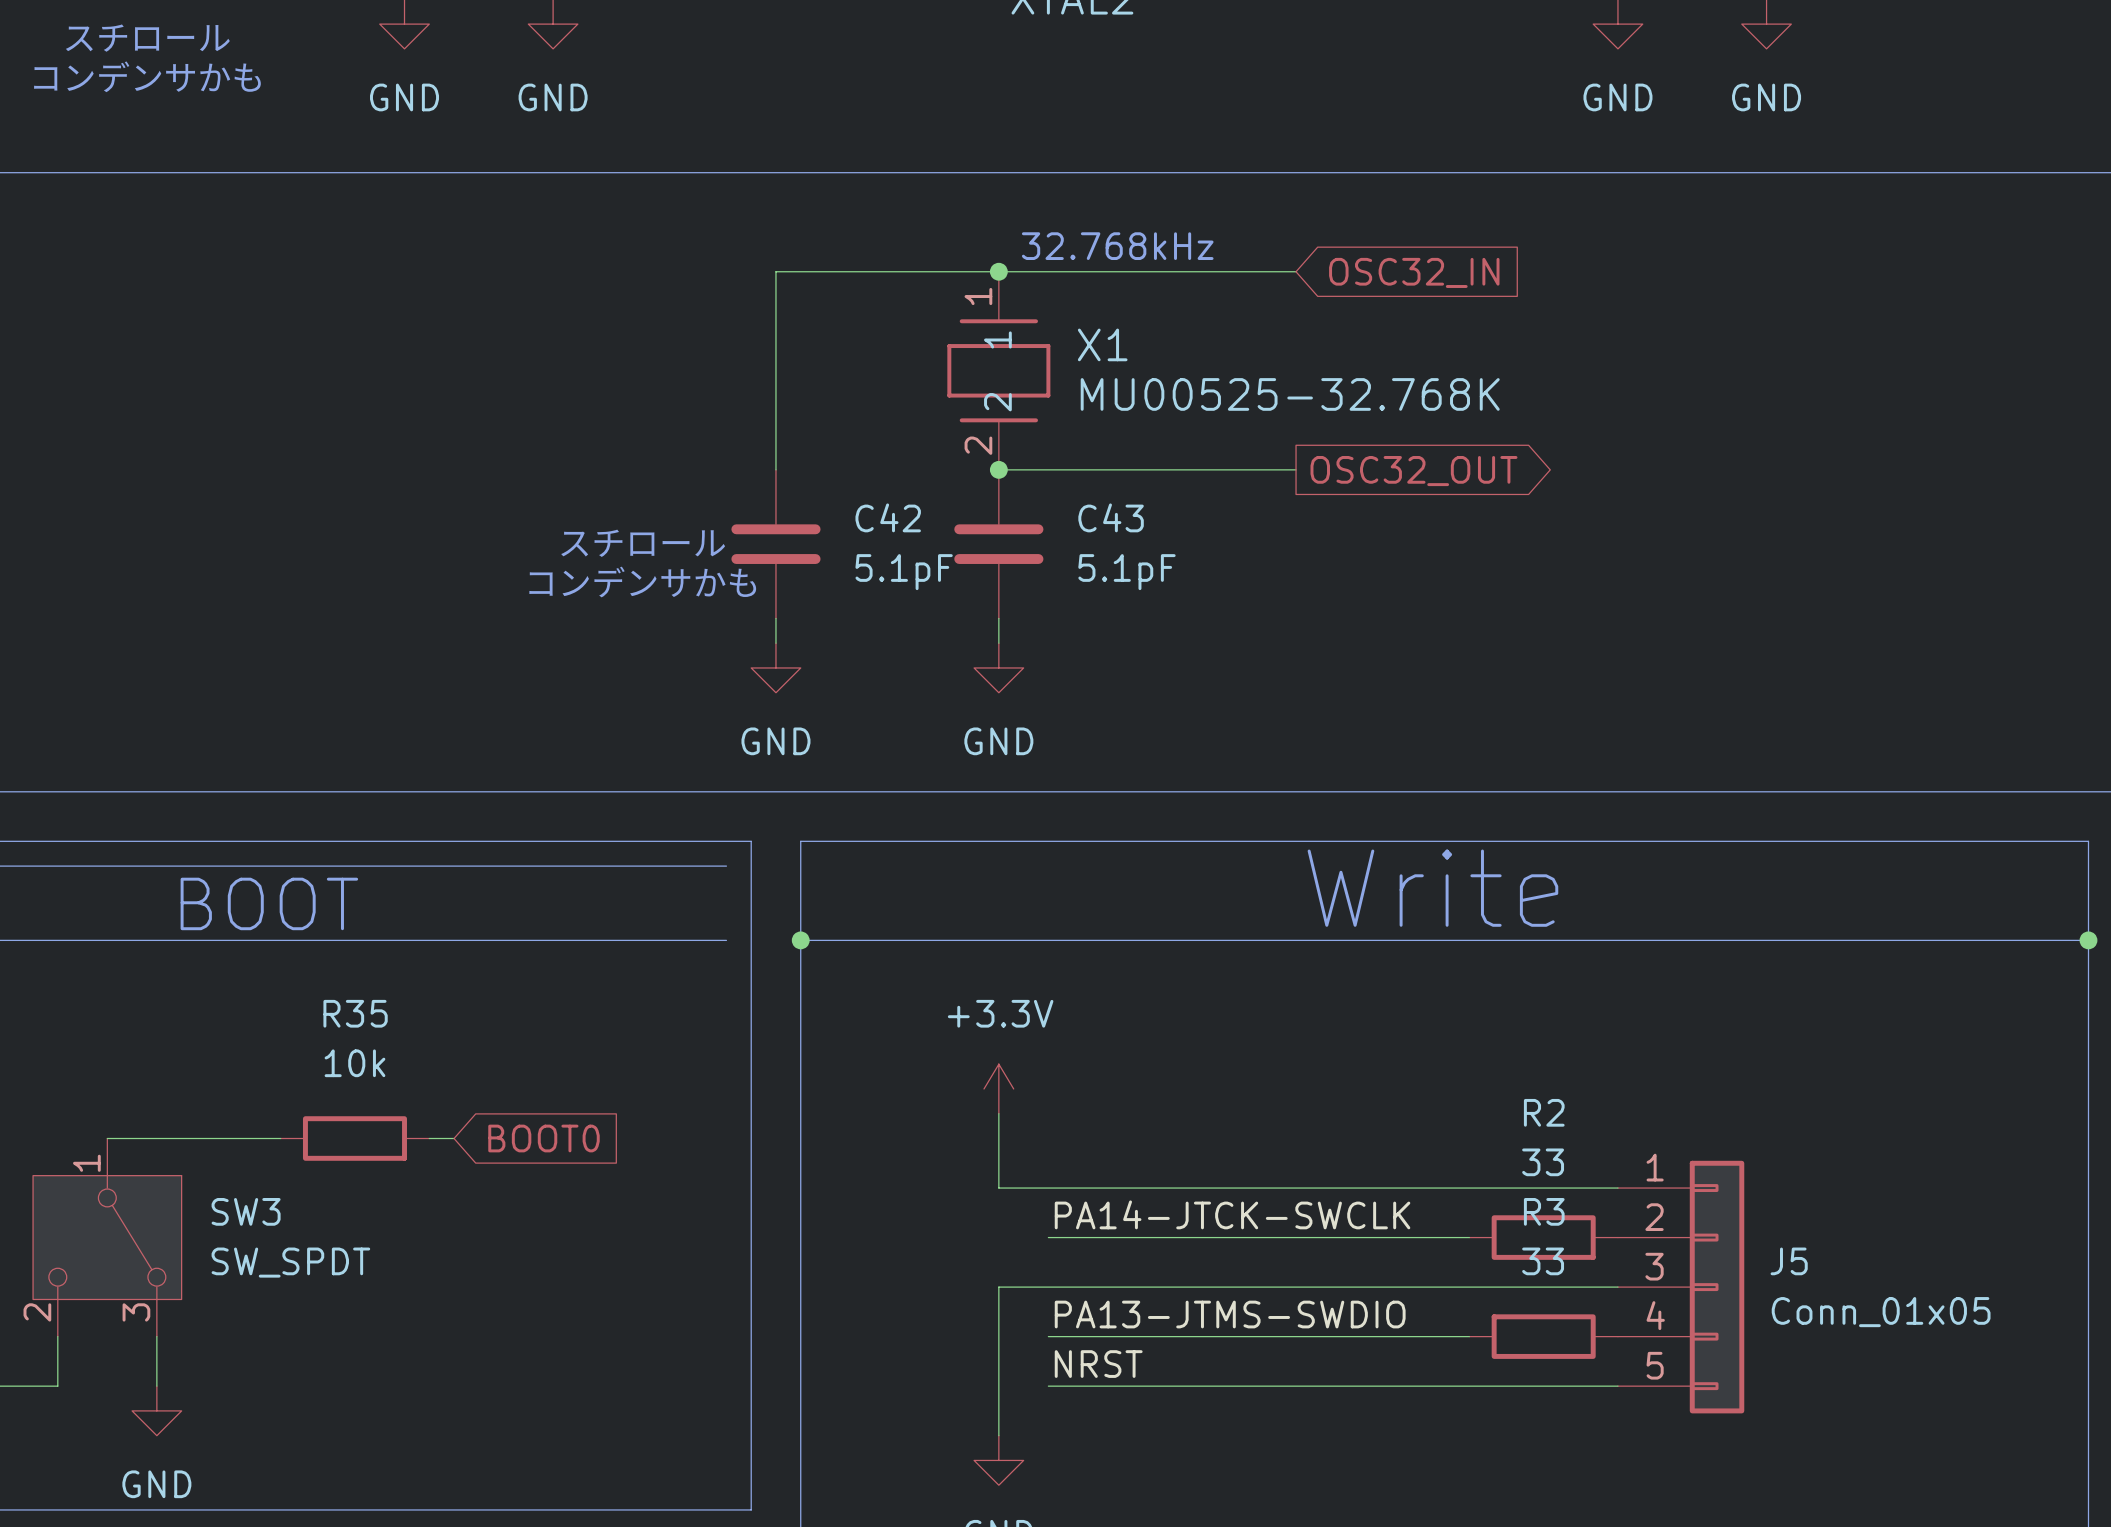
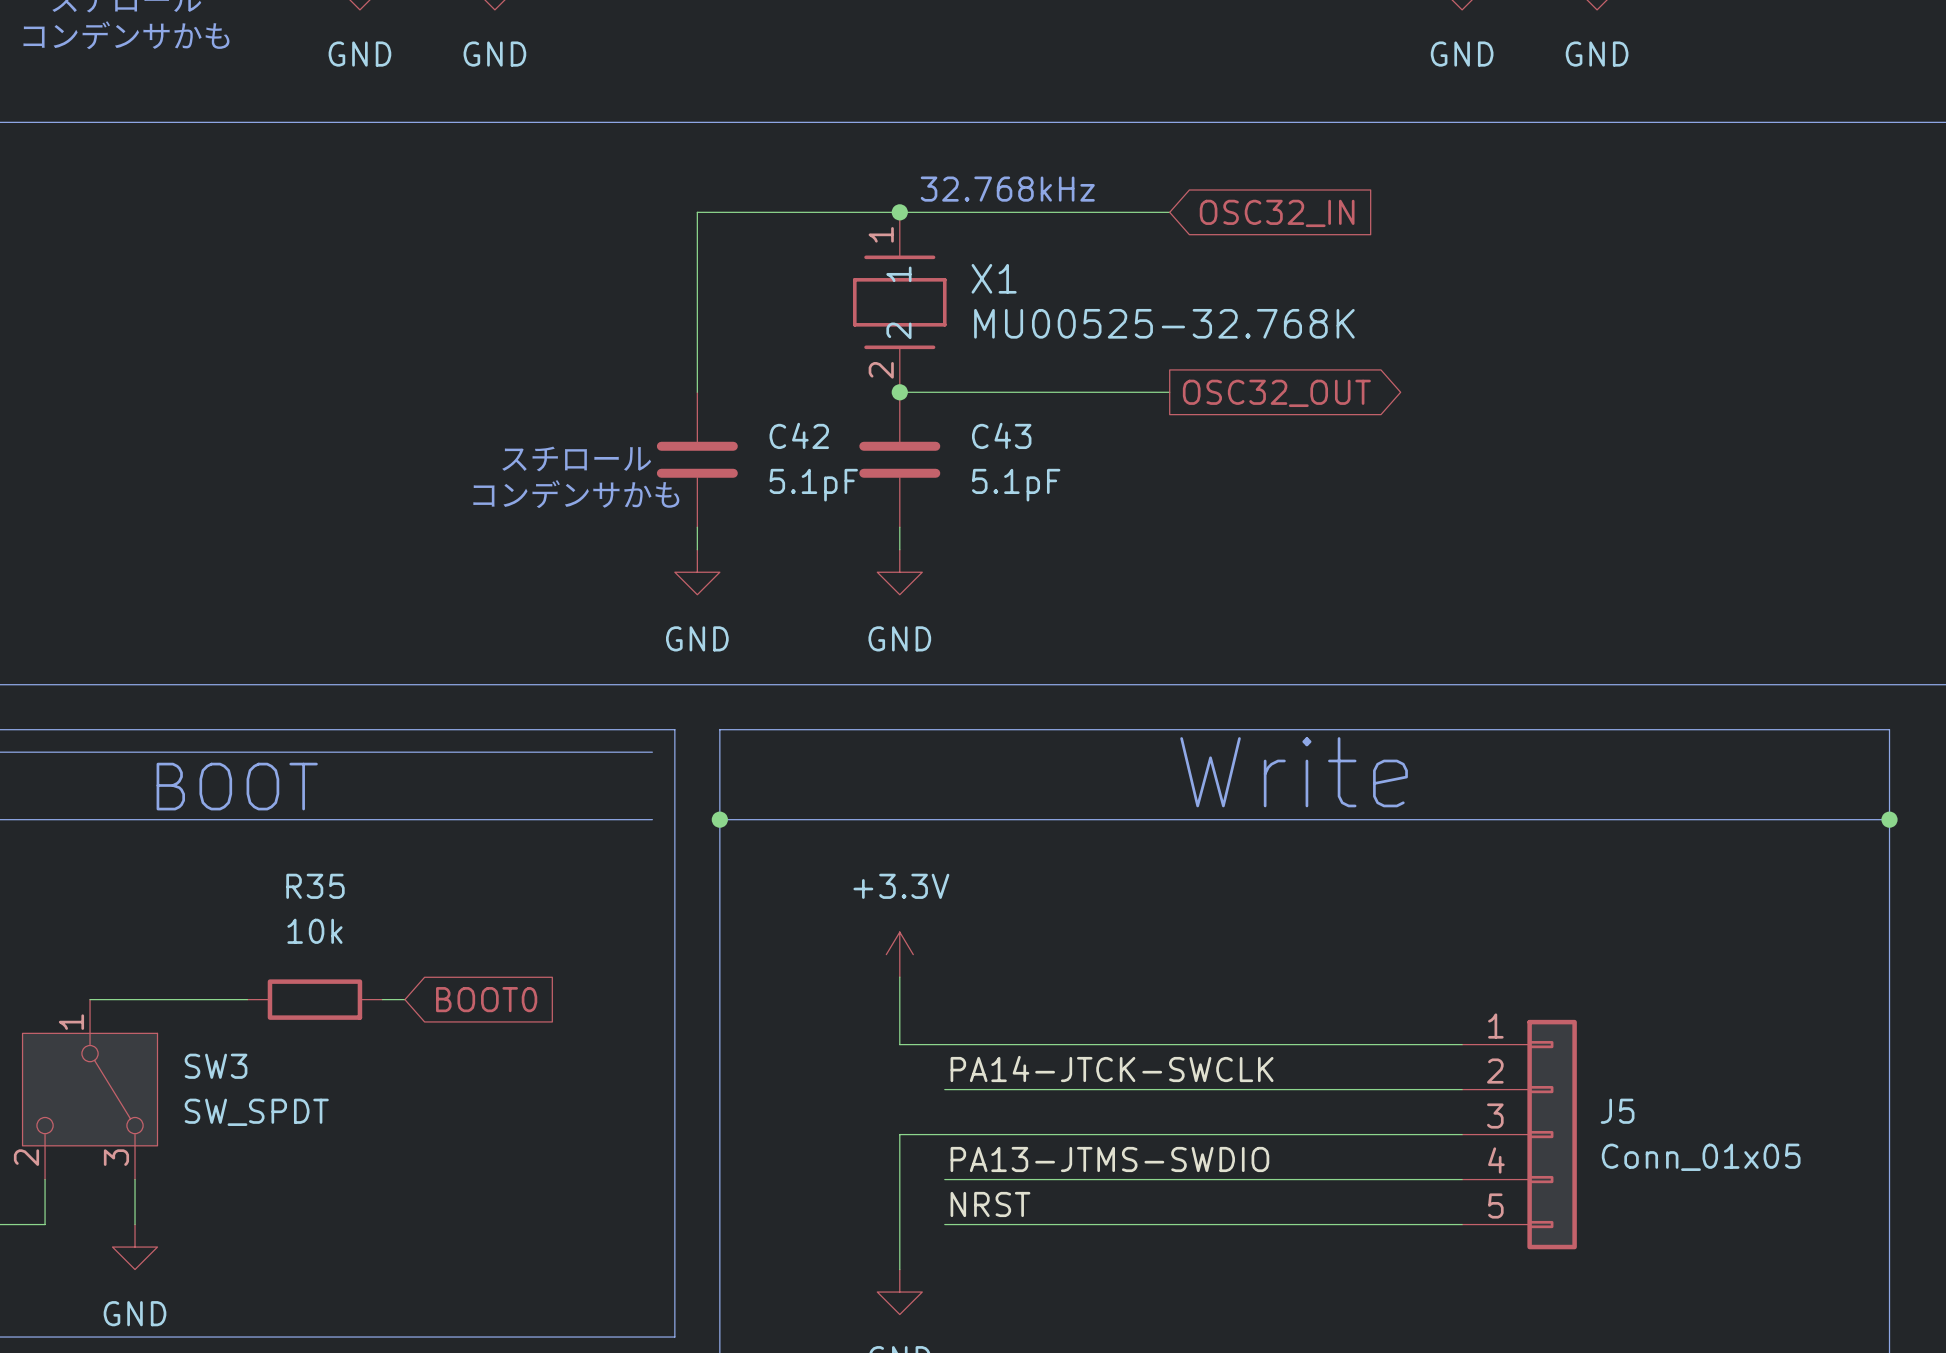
wire: none -> (1327, 1089) (1462, 1089)
R2: 33 (1543, 1237) -> none
wire: none -> (1327, 1179) (1462, 1179)
R3: 33 (1543, 1336) -> none

